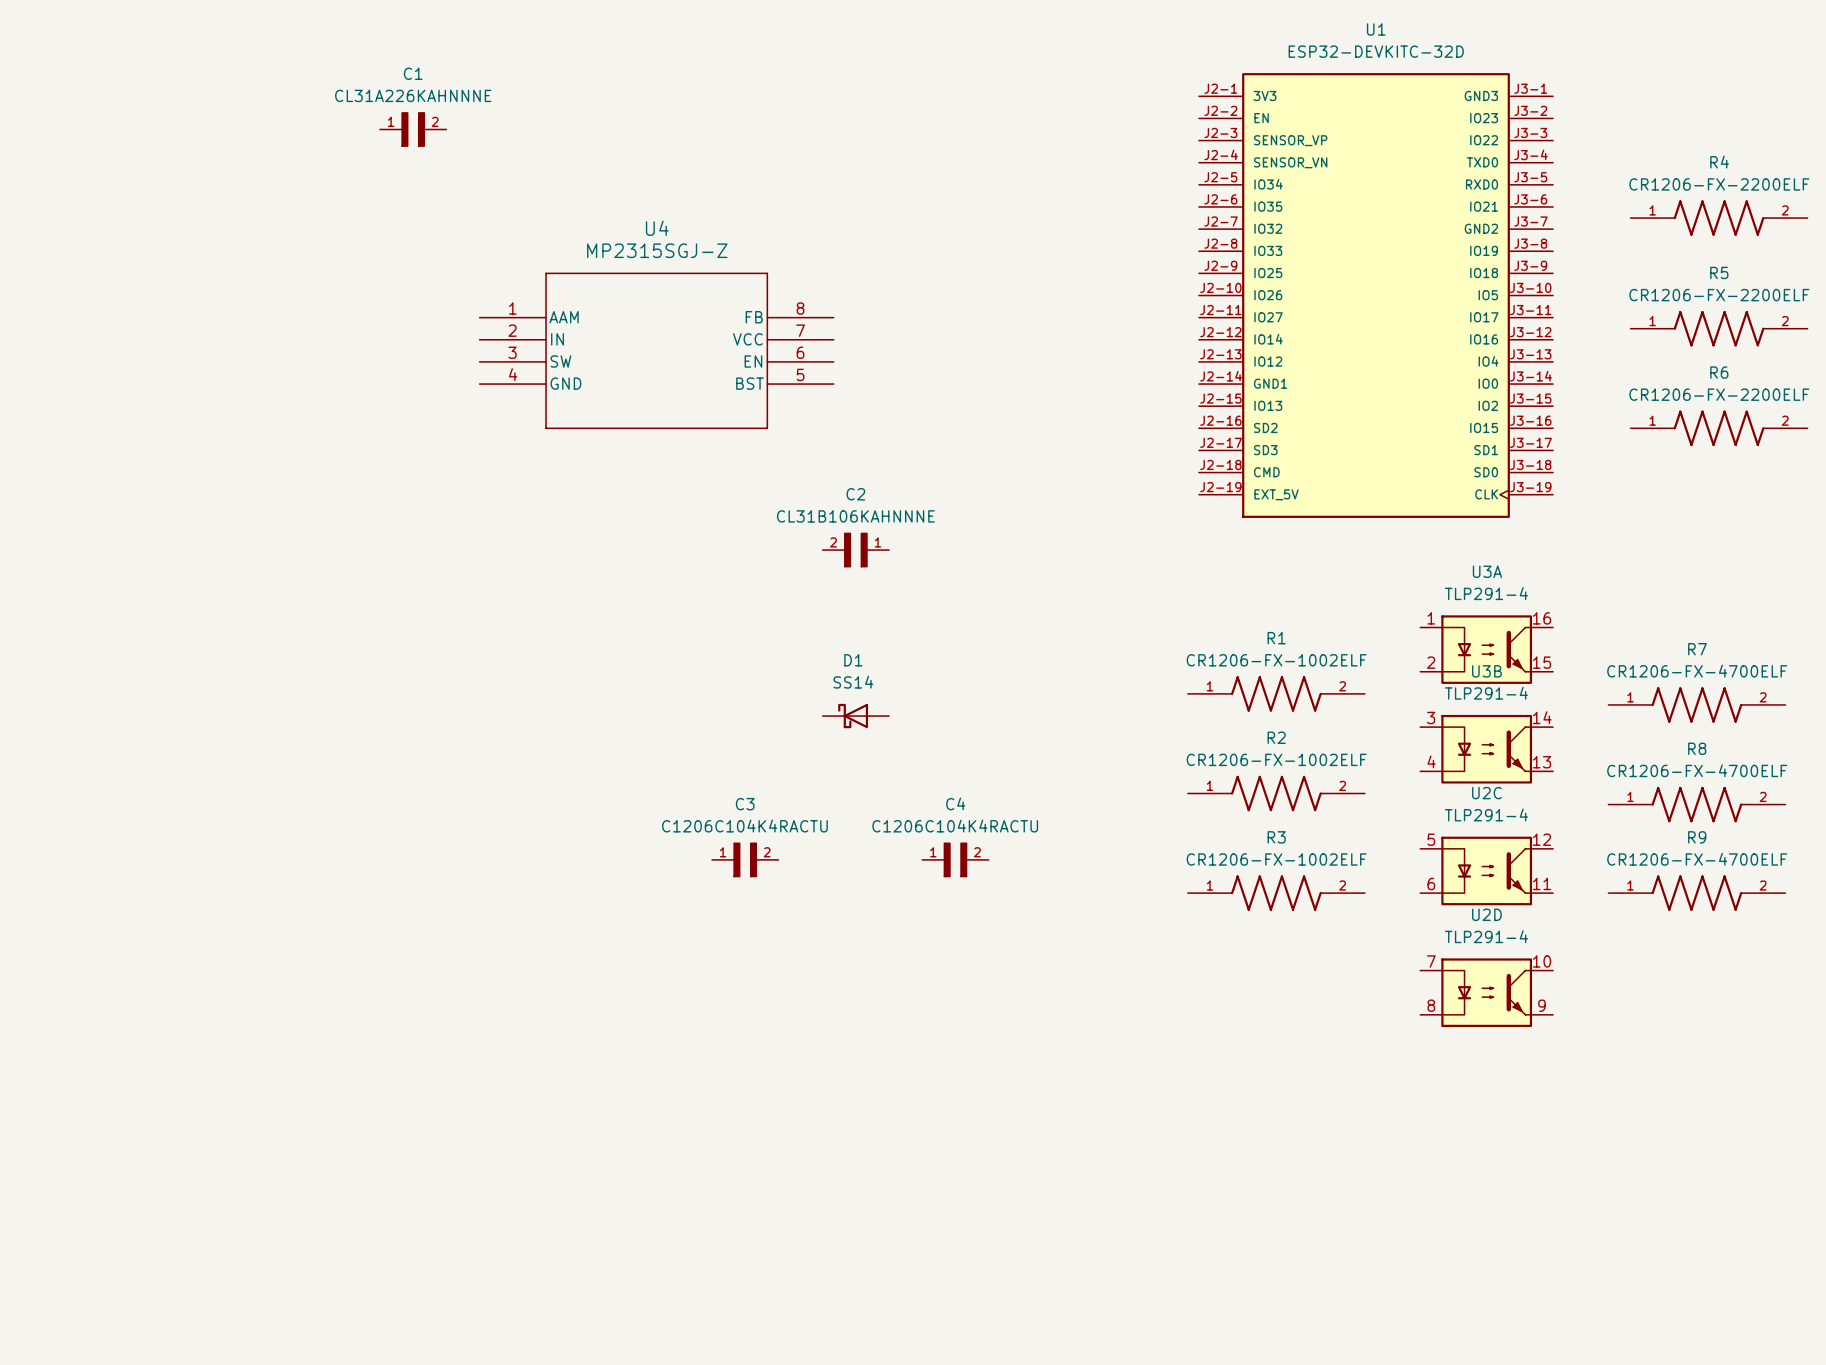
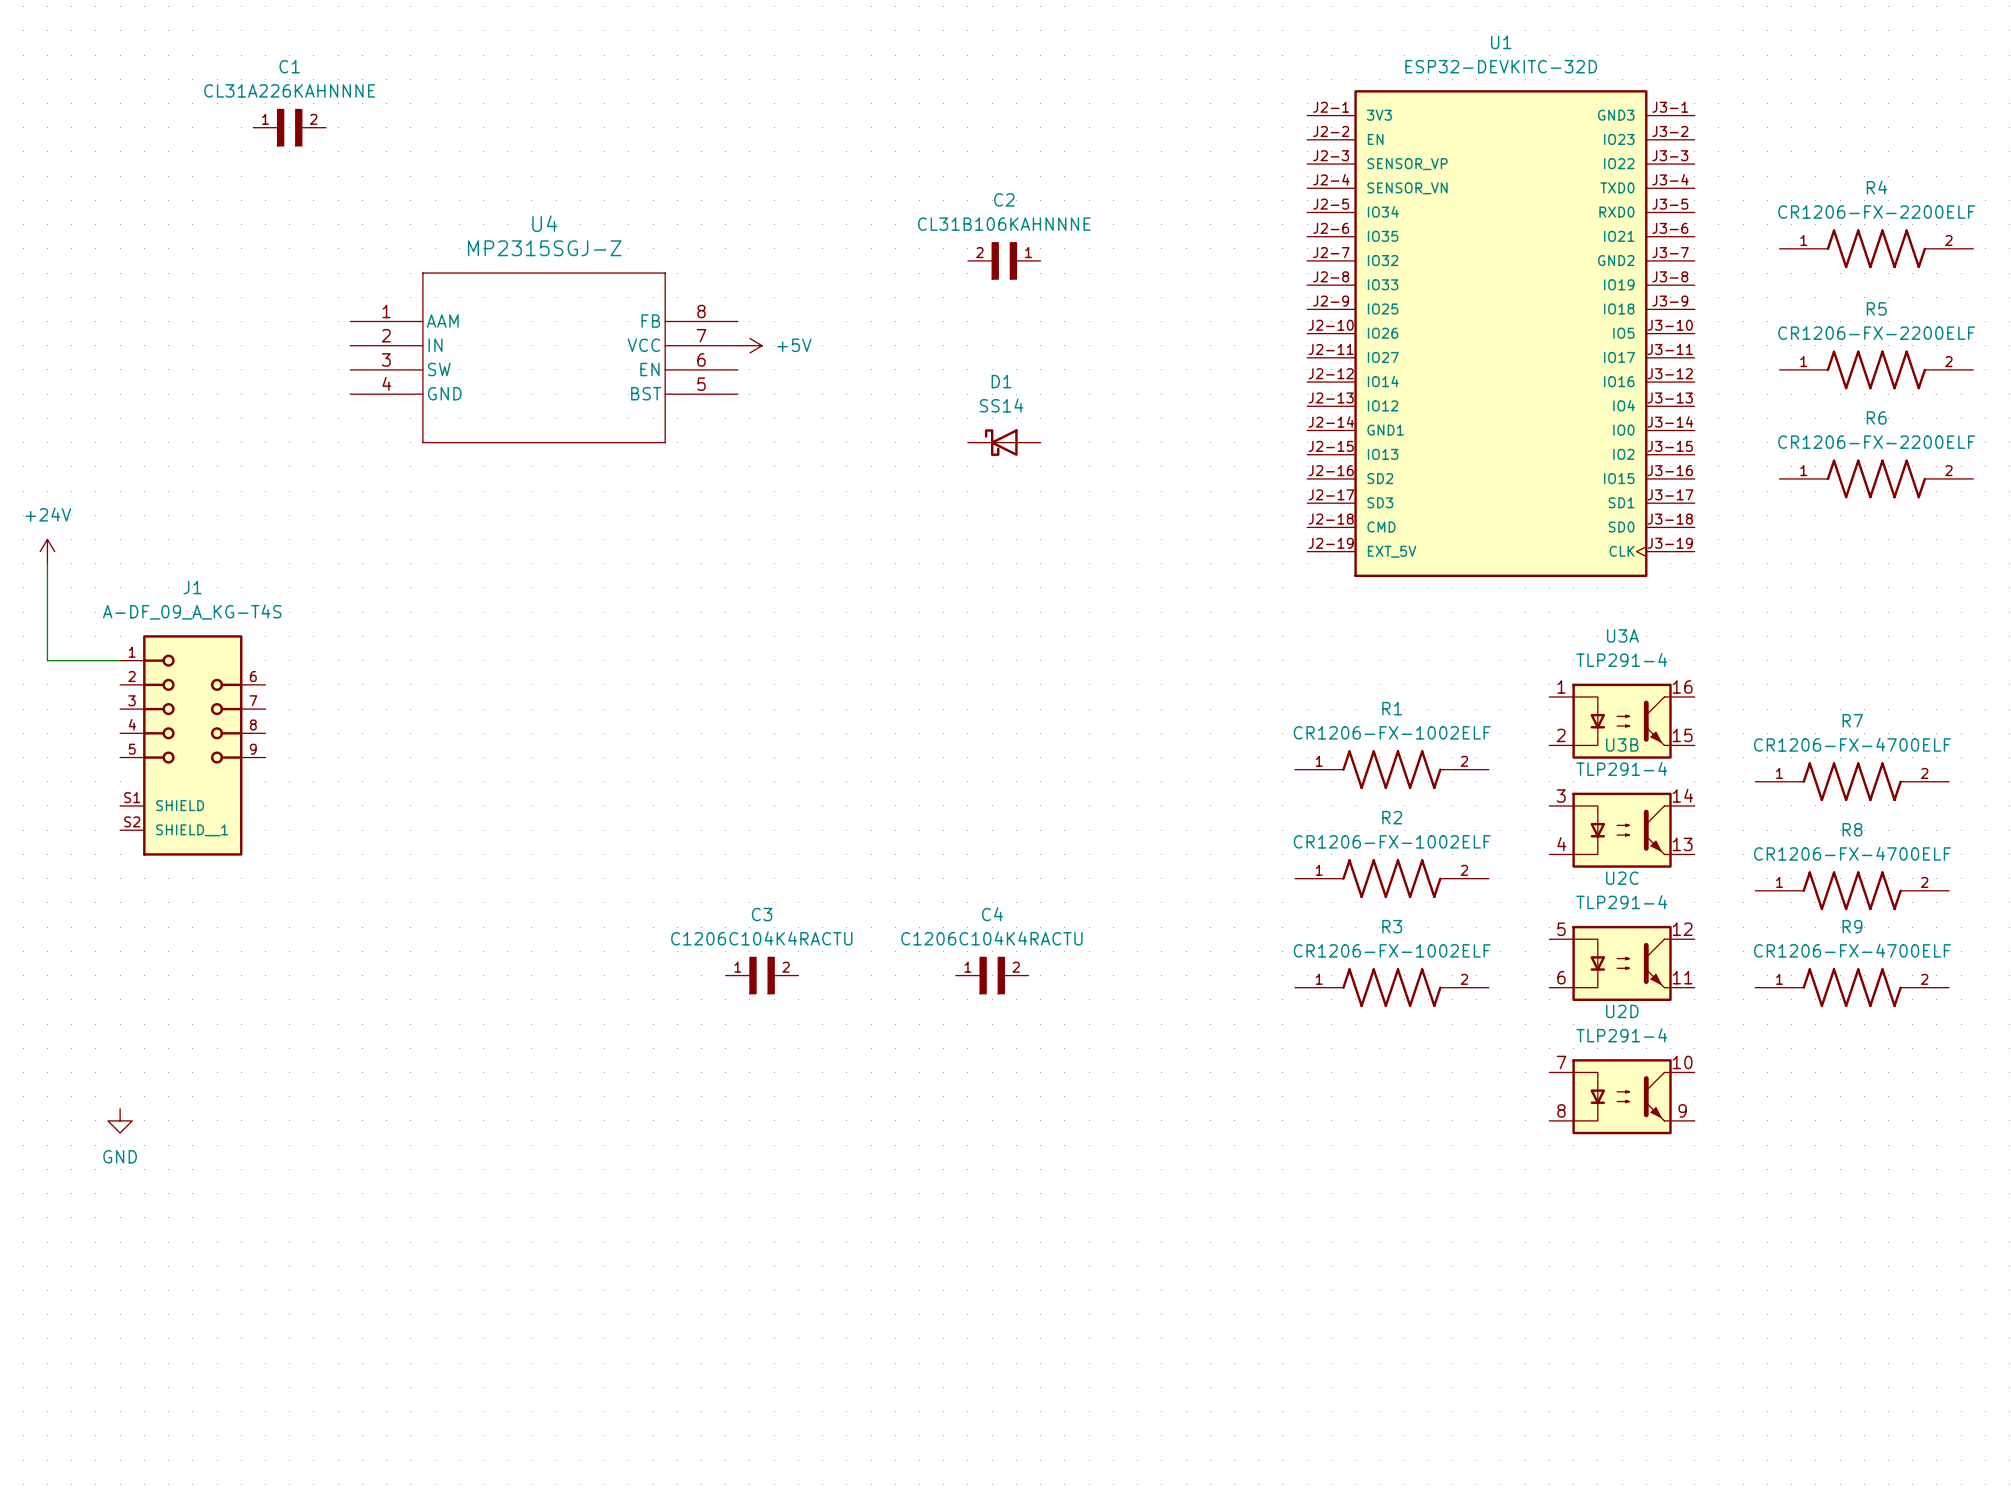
C1 position: (413, 129) -> (289, 127)
power symbol: none -> +5V (749, 345)
U4 position: (656, 350) -> (544, 357)
power symbol: none -> +24V (47, 551)
wire: none -> (47, 563) (47, 660) (120, 660)
C2 position: (855, 550) -> (1004, 260)
J1: none -> A-DF_09_A_KG-T4S (192, 745)
D1 position: (855, 716) -> (1004, 442)
C3 position: (745, 859) -> (762, 975)
C4 position: (955, 859) -> (992, 975)
power symbol: none -> GND (120, 1120)

